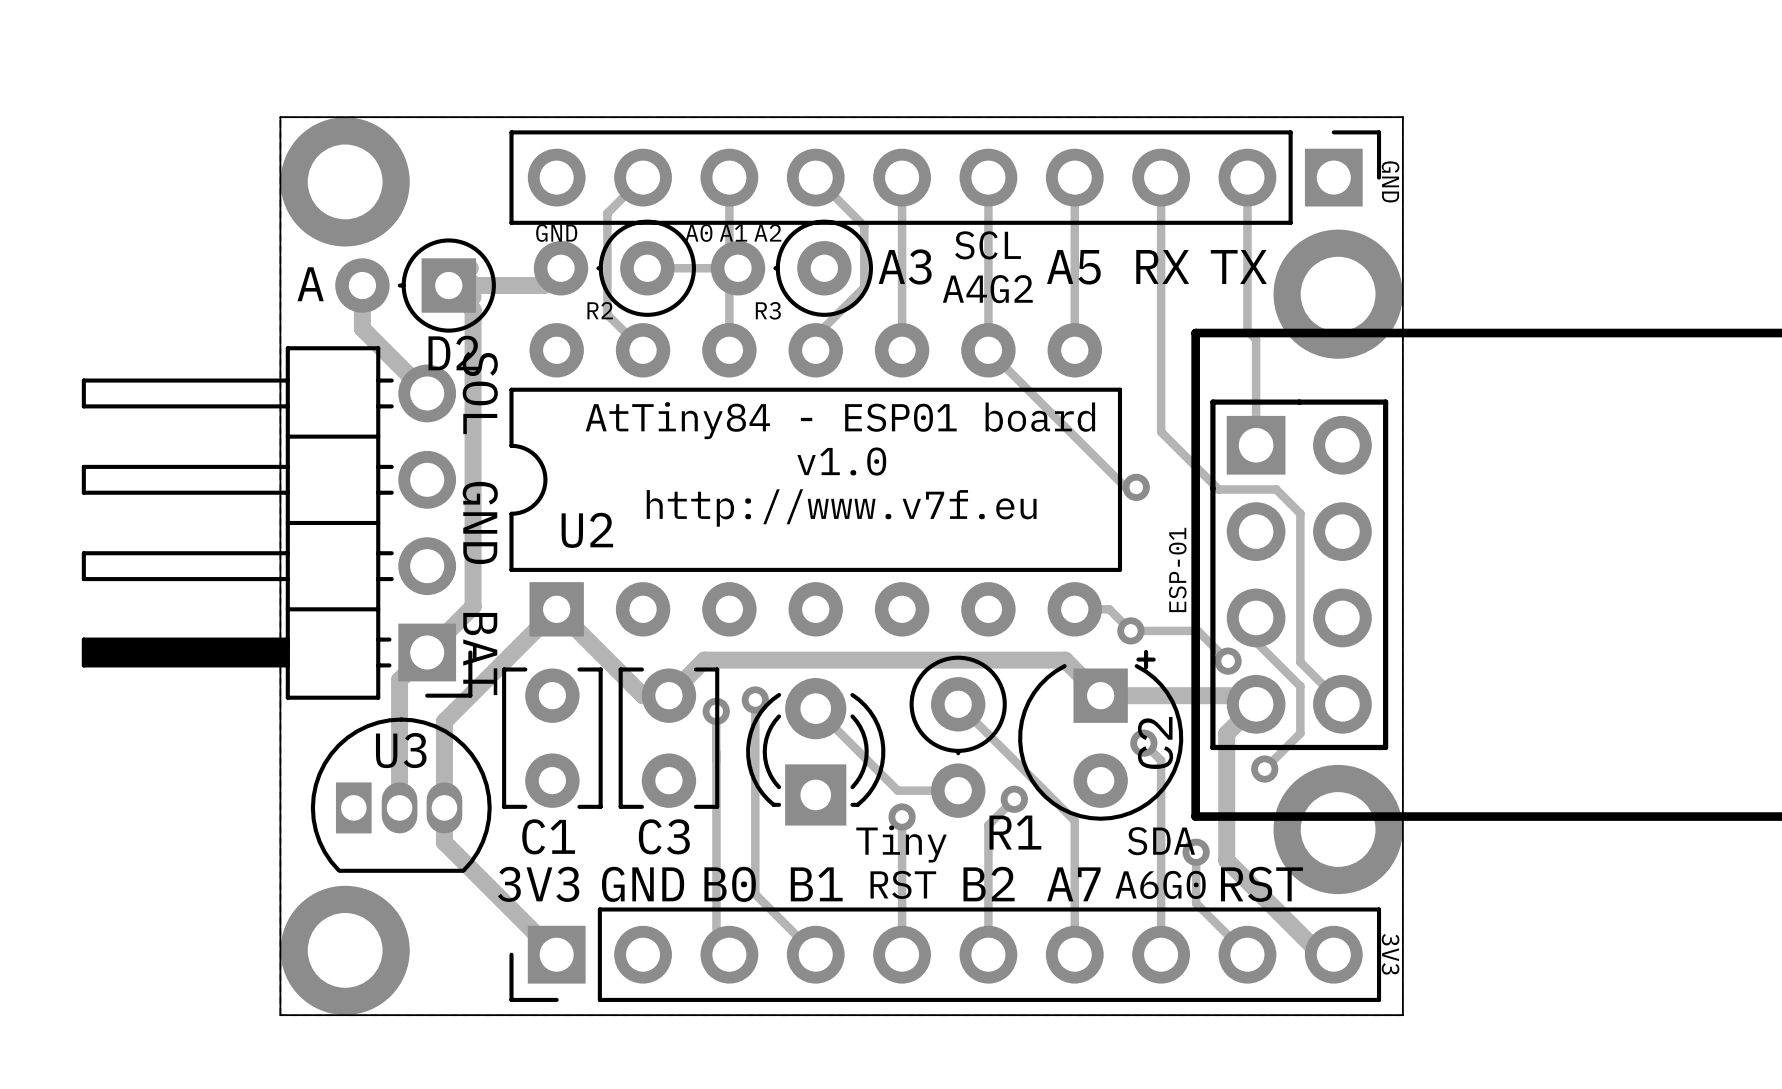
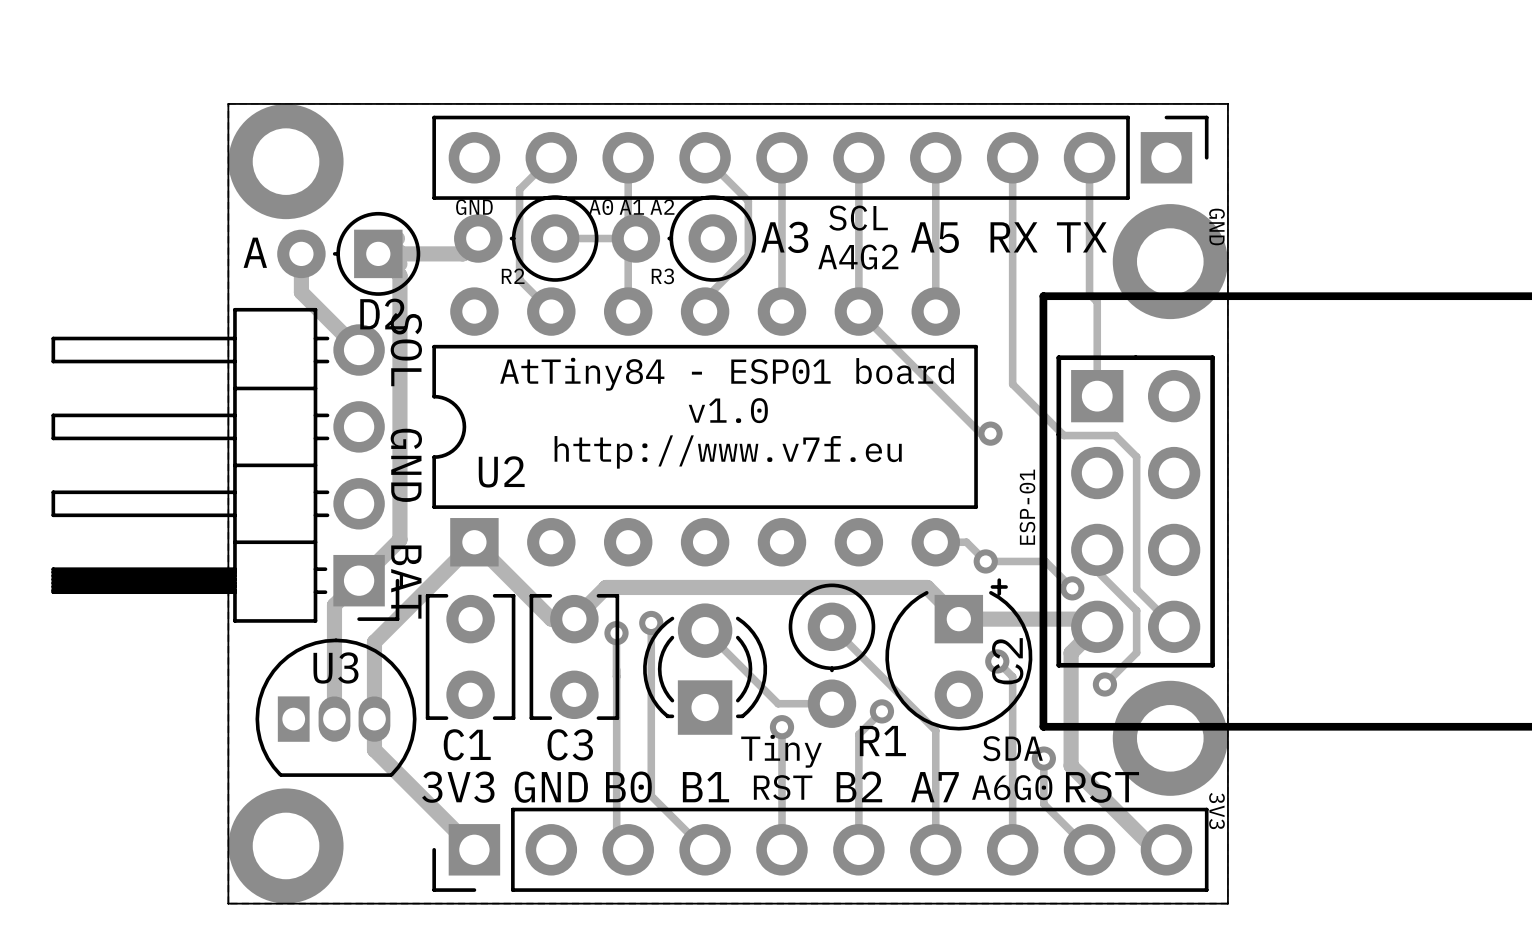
text position: GND (1390, 181) -> GND (1216, 226)
text position: 3V3 (1390, 954) -> 3V3 (1216, 810)

